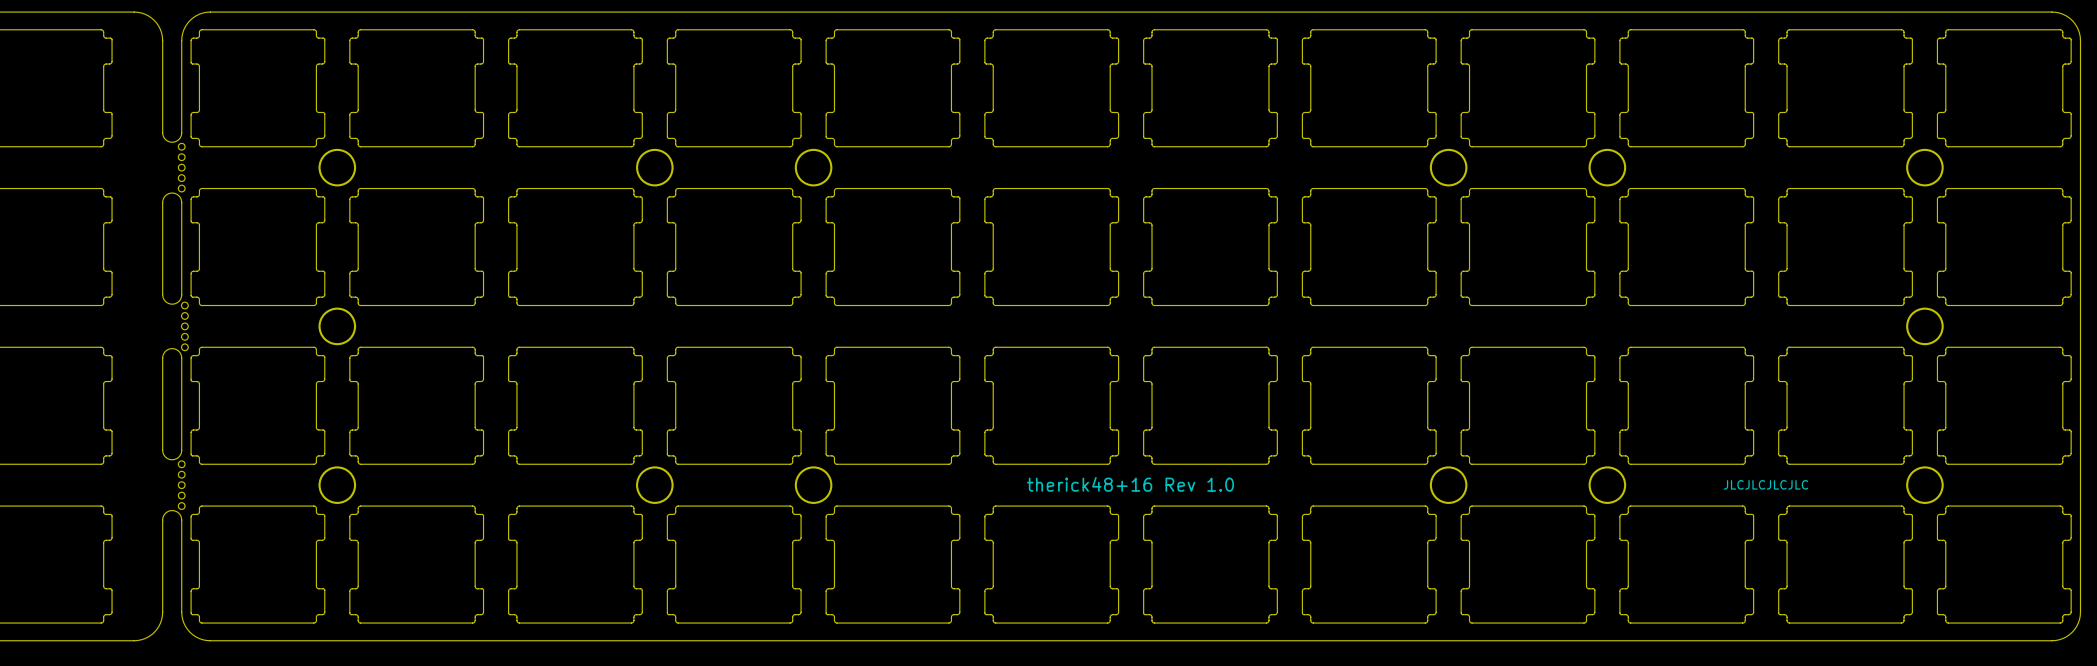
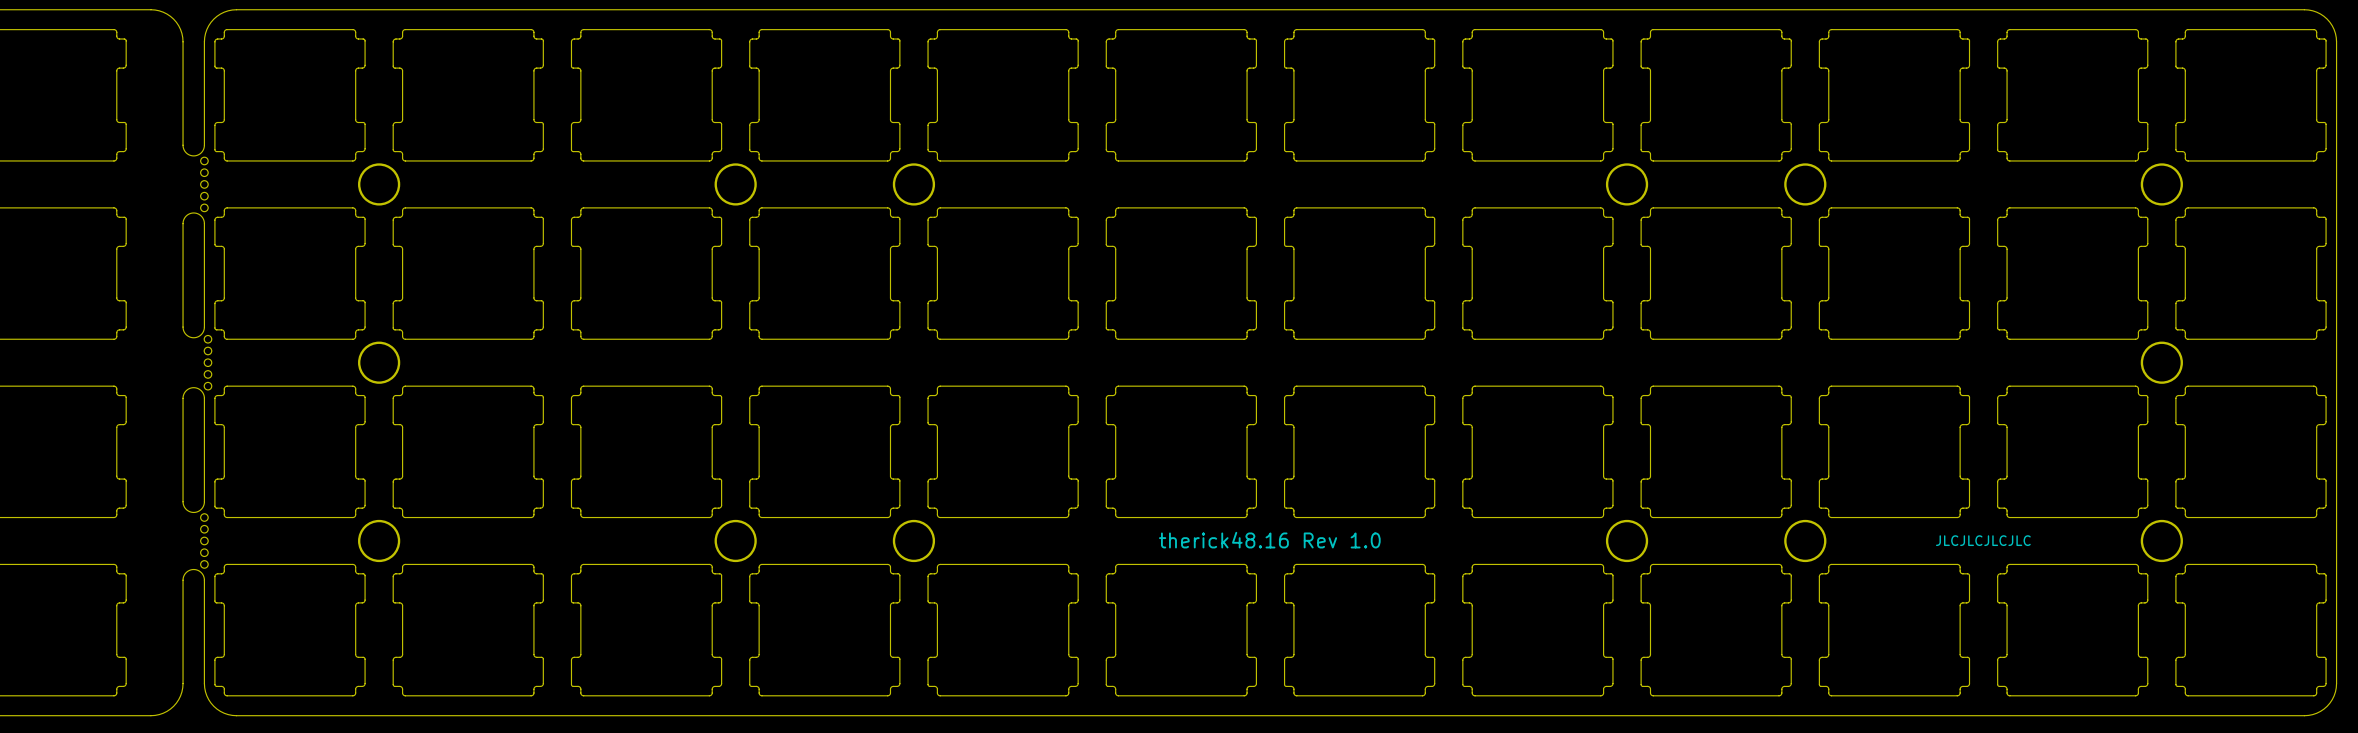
text: therick48+16 Rev 1.0 (1130, 484) -> therick48.16 Rev 1.0 (1269, 540)

